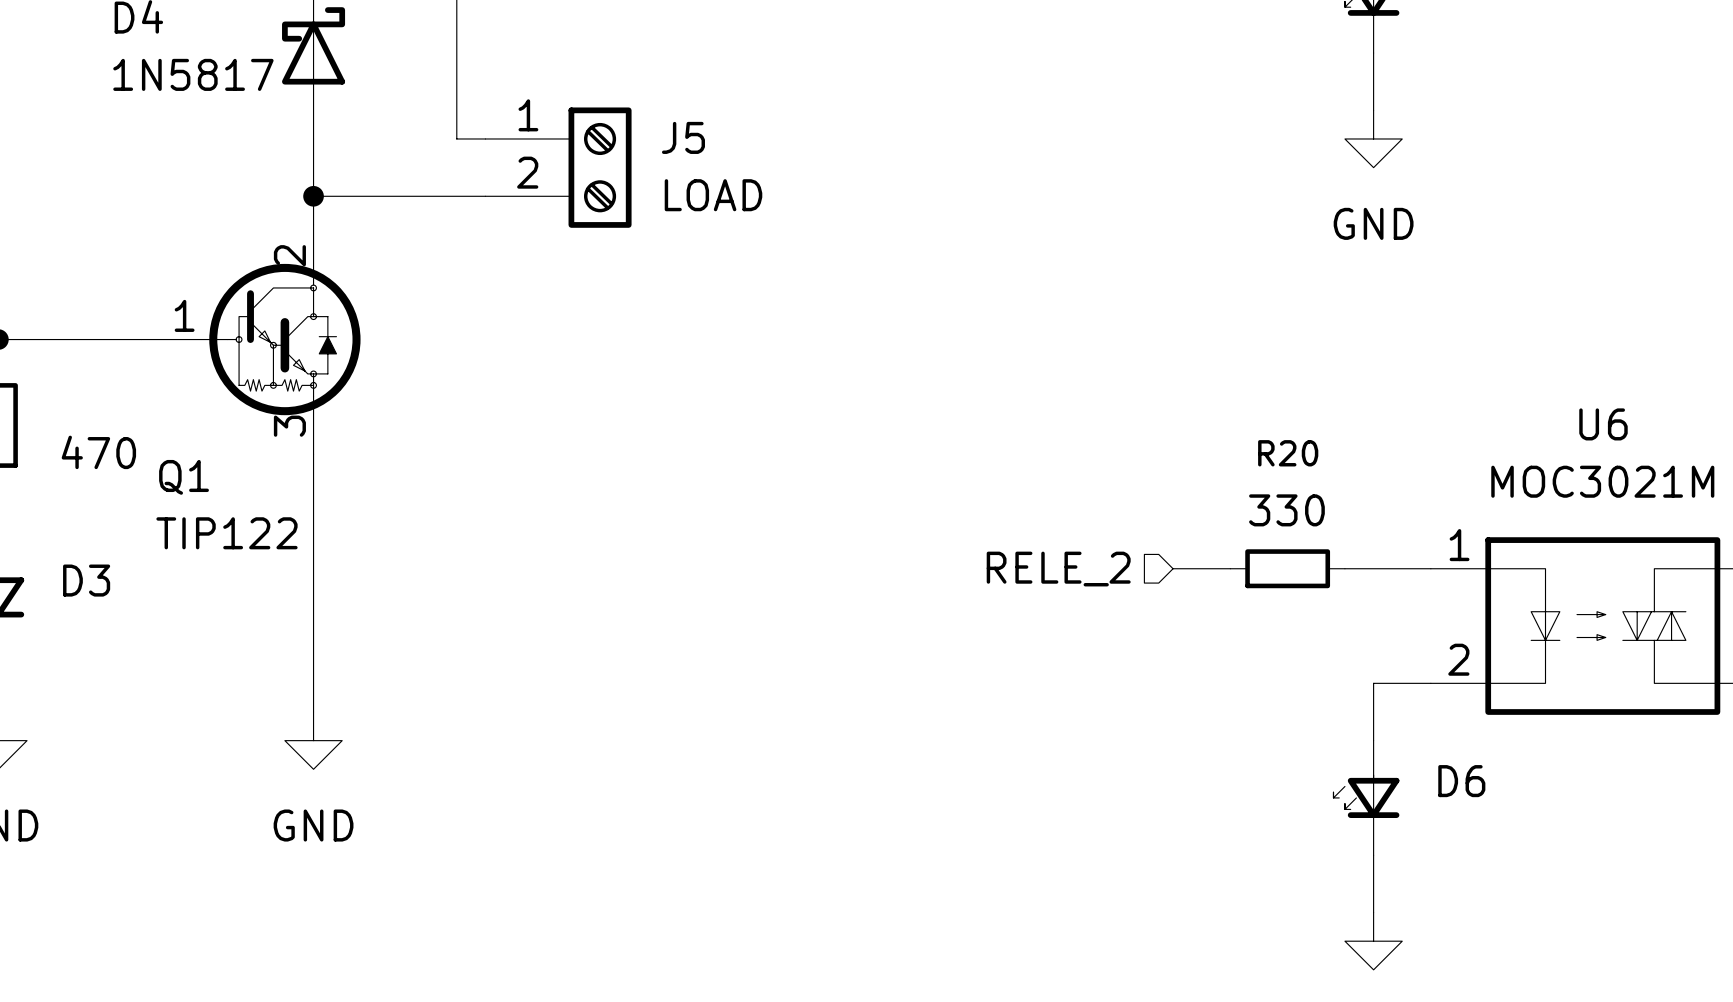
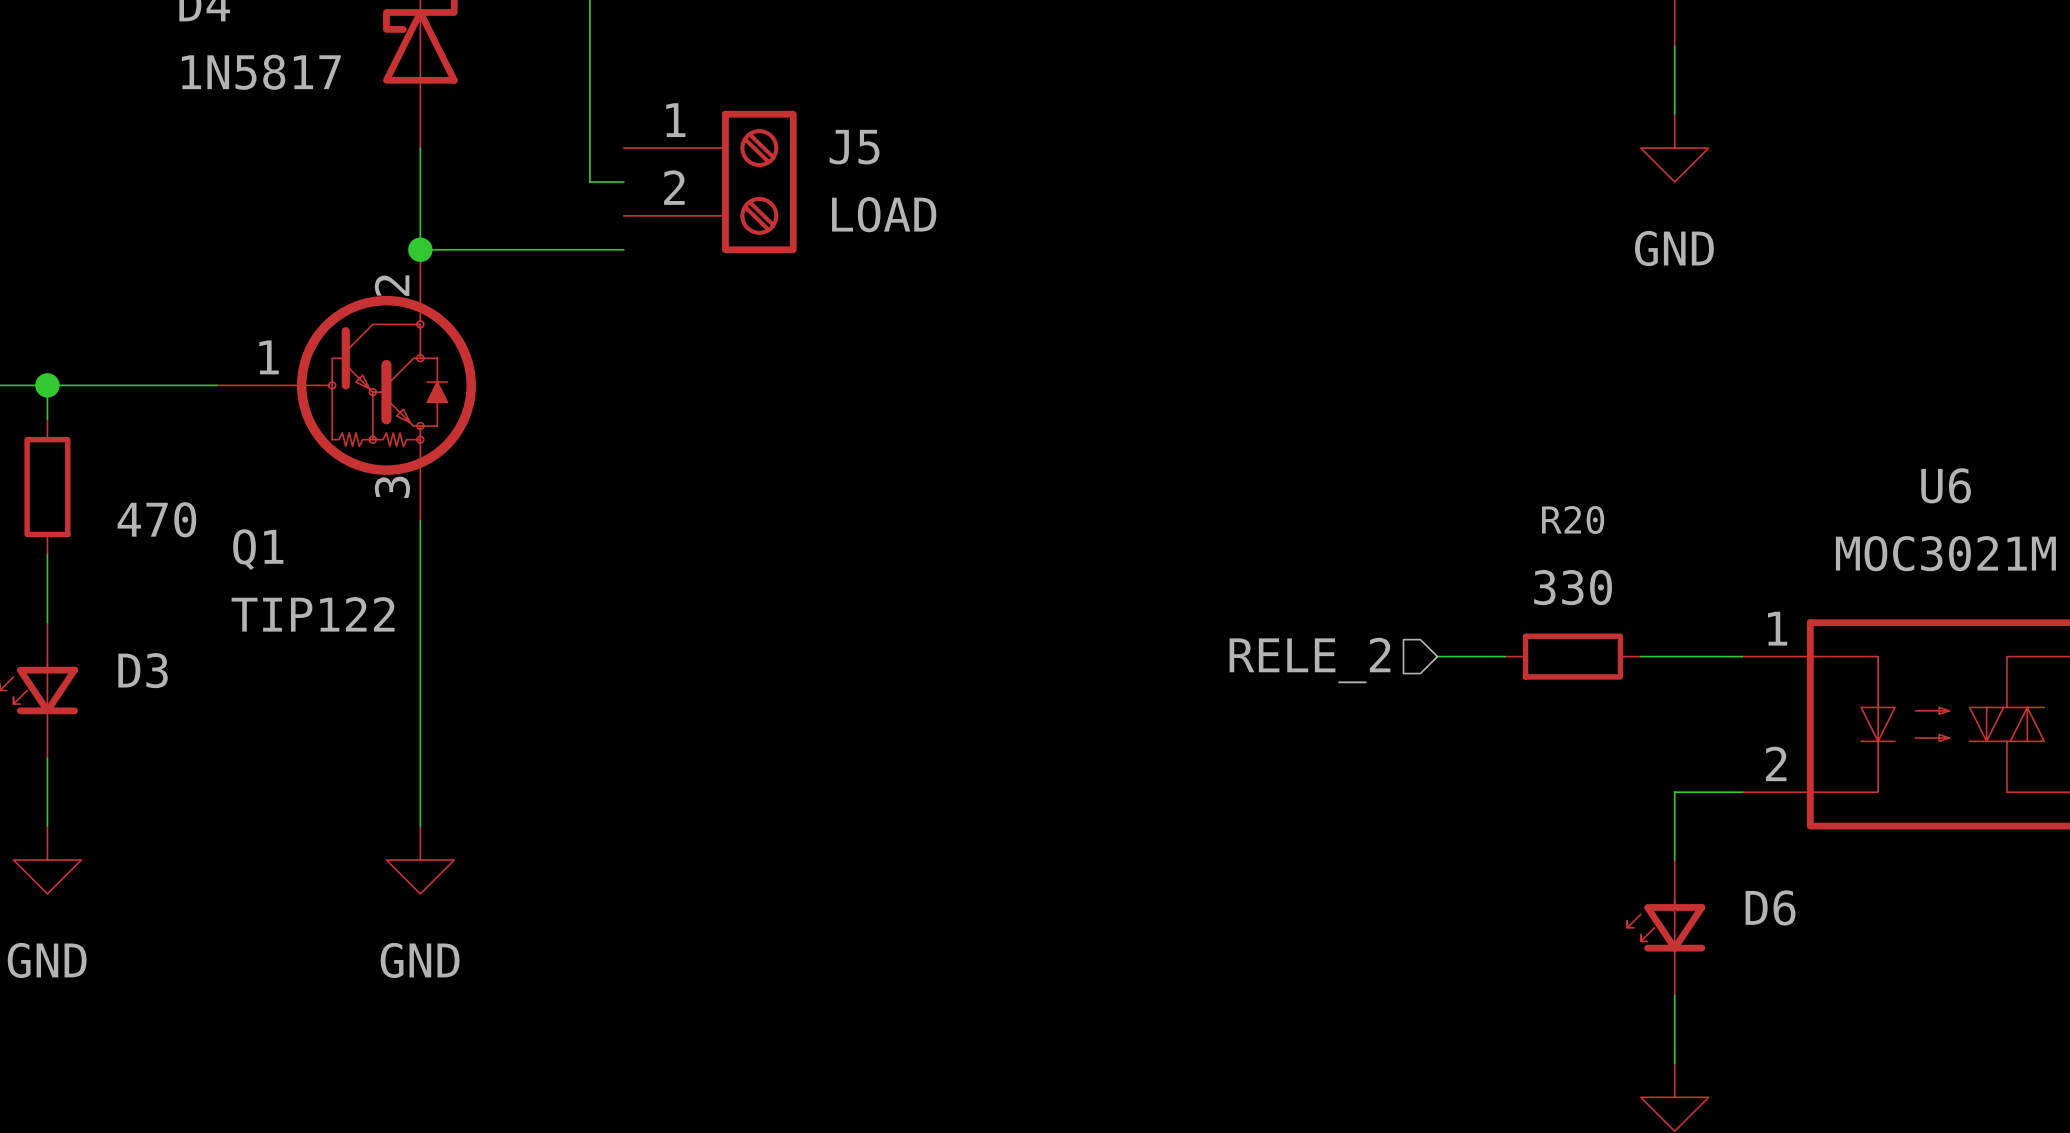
wire: (456, 138) (485, 138) -> (589, 148) (589, 181) (623, 181)
wire: (313, 196) (485, 196) -> (420, 249) (623, 249)
junction position: (313, 196) -> (420, 249)

